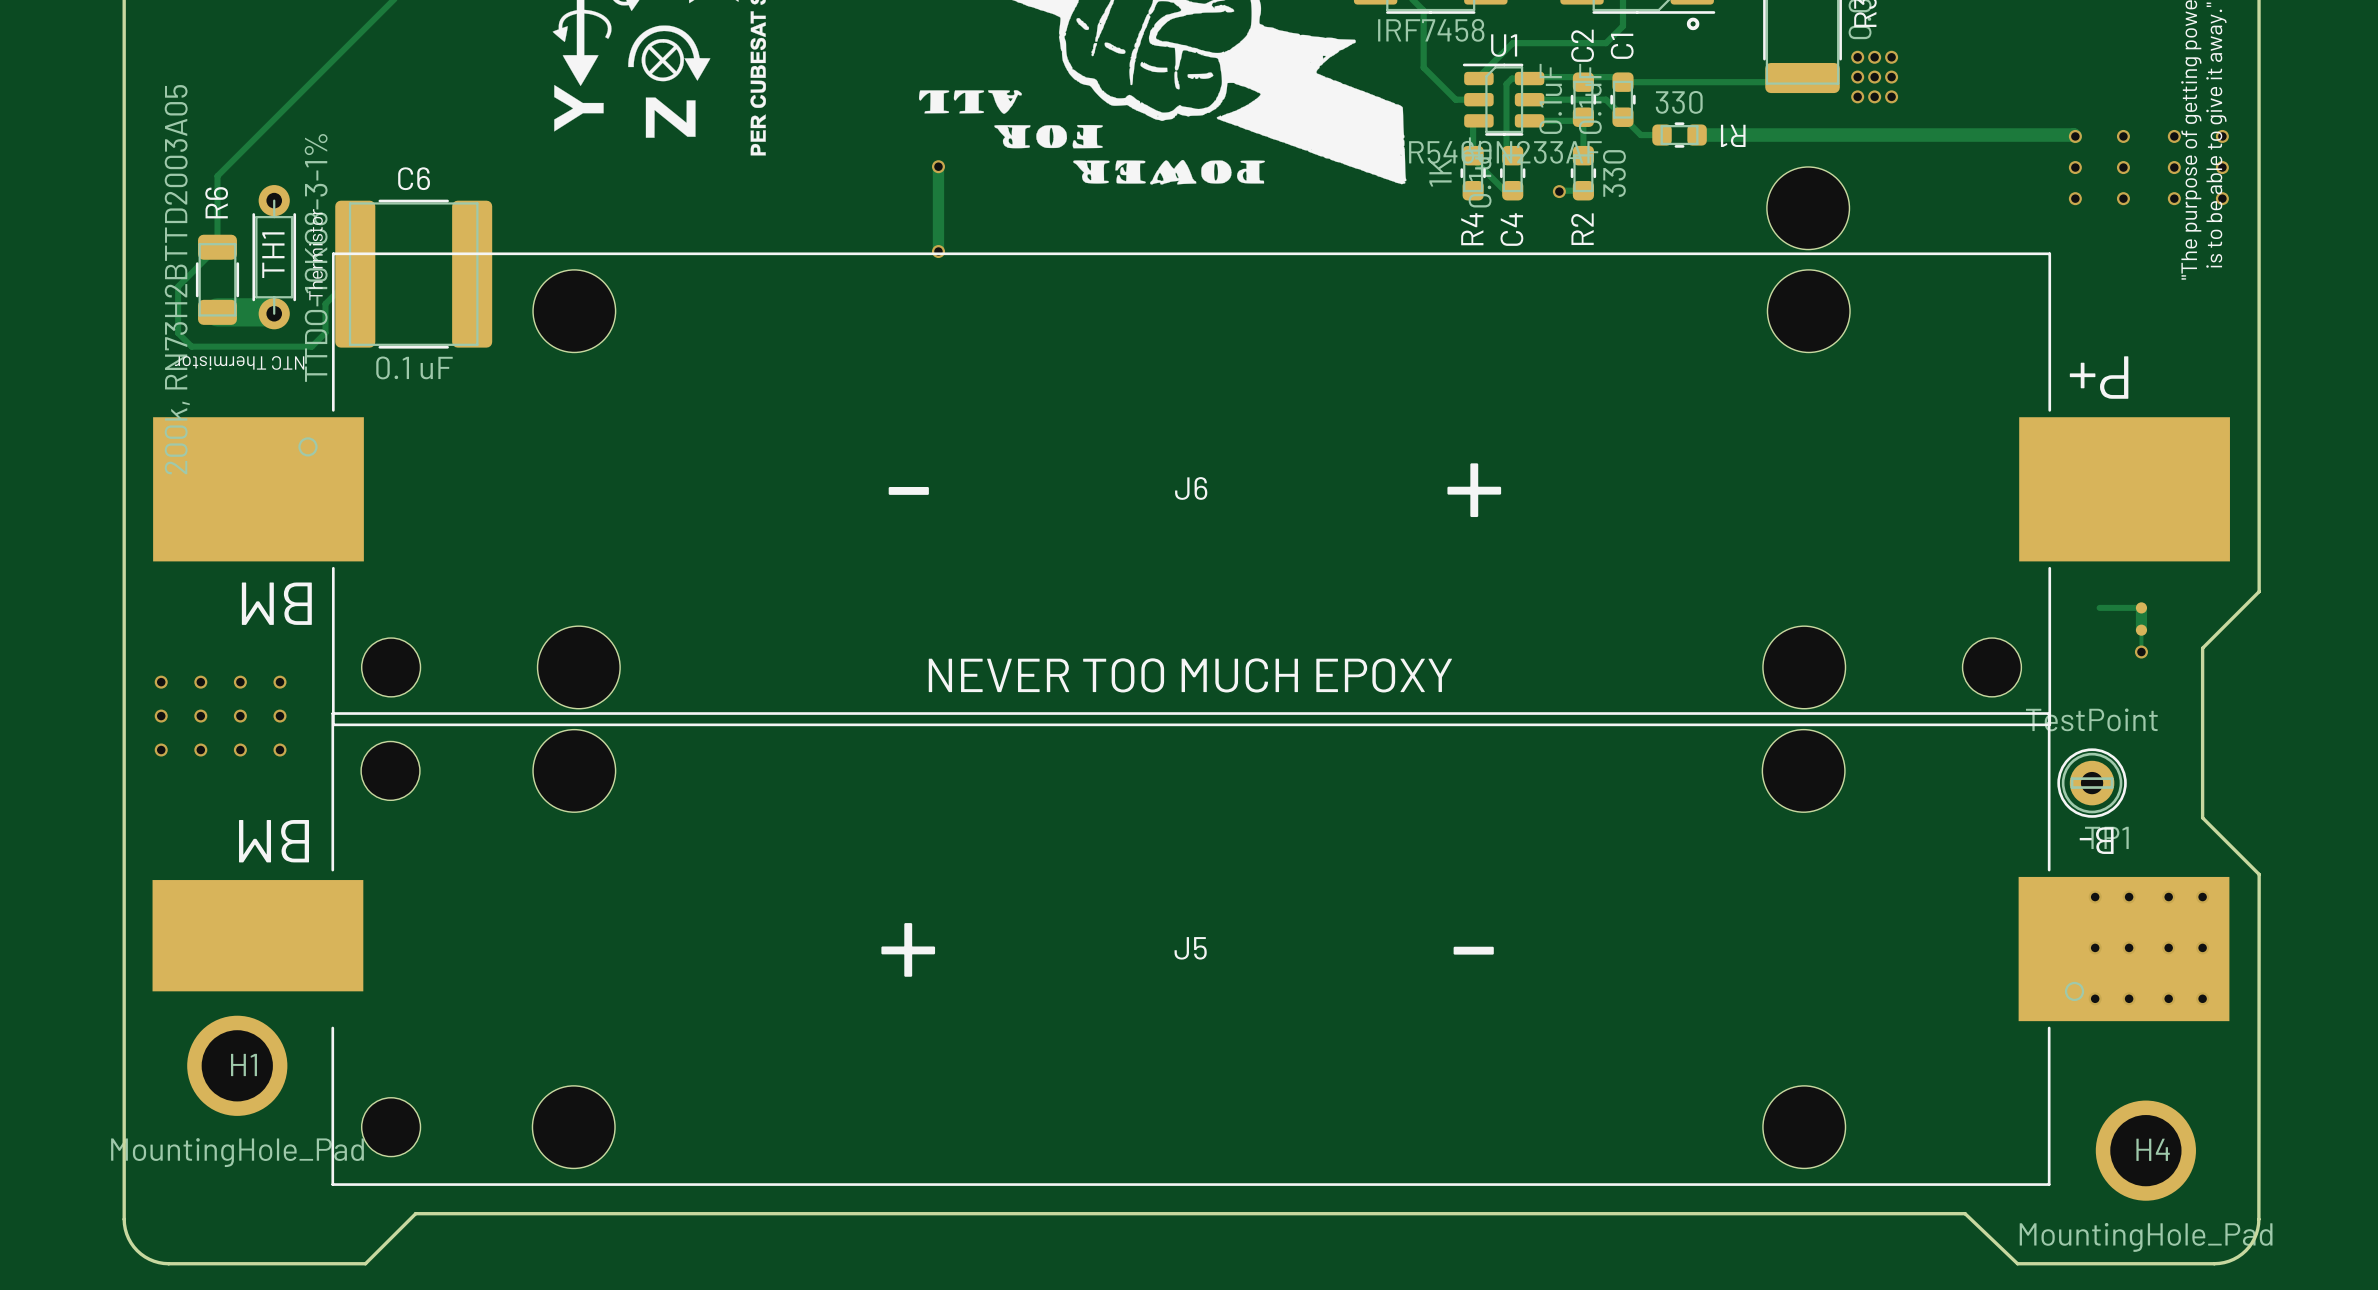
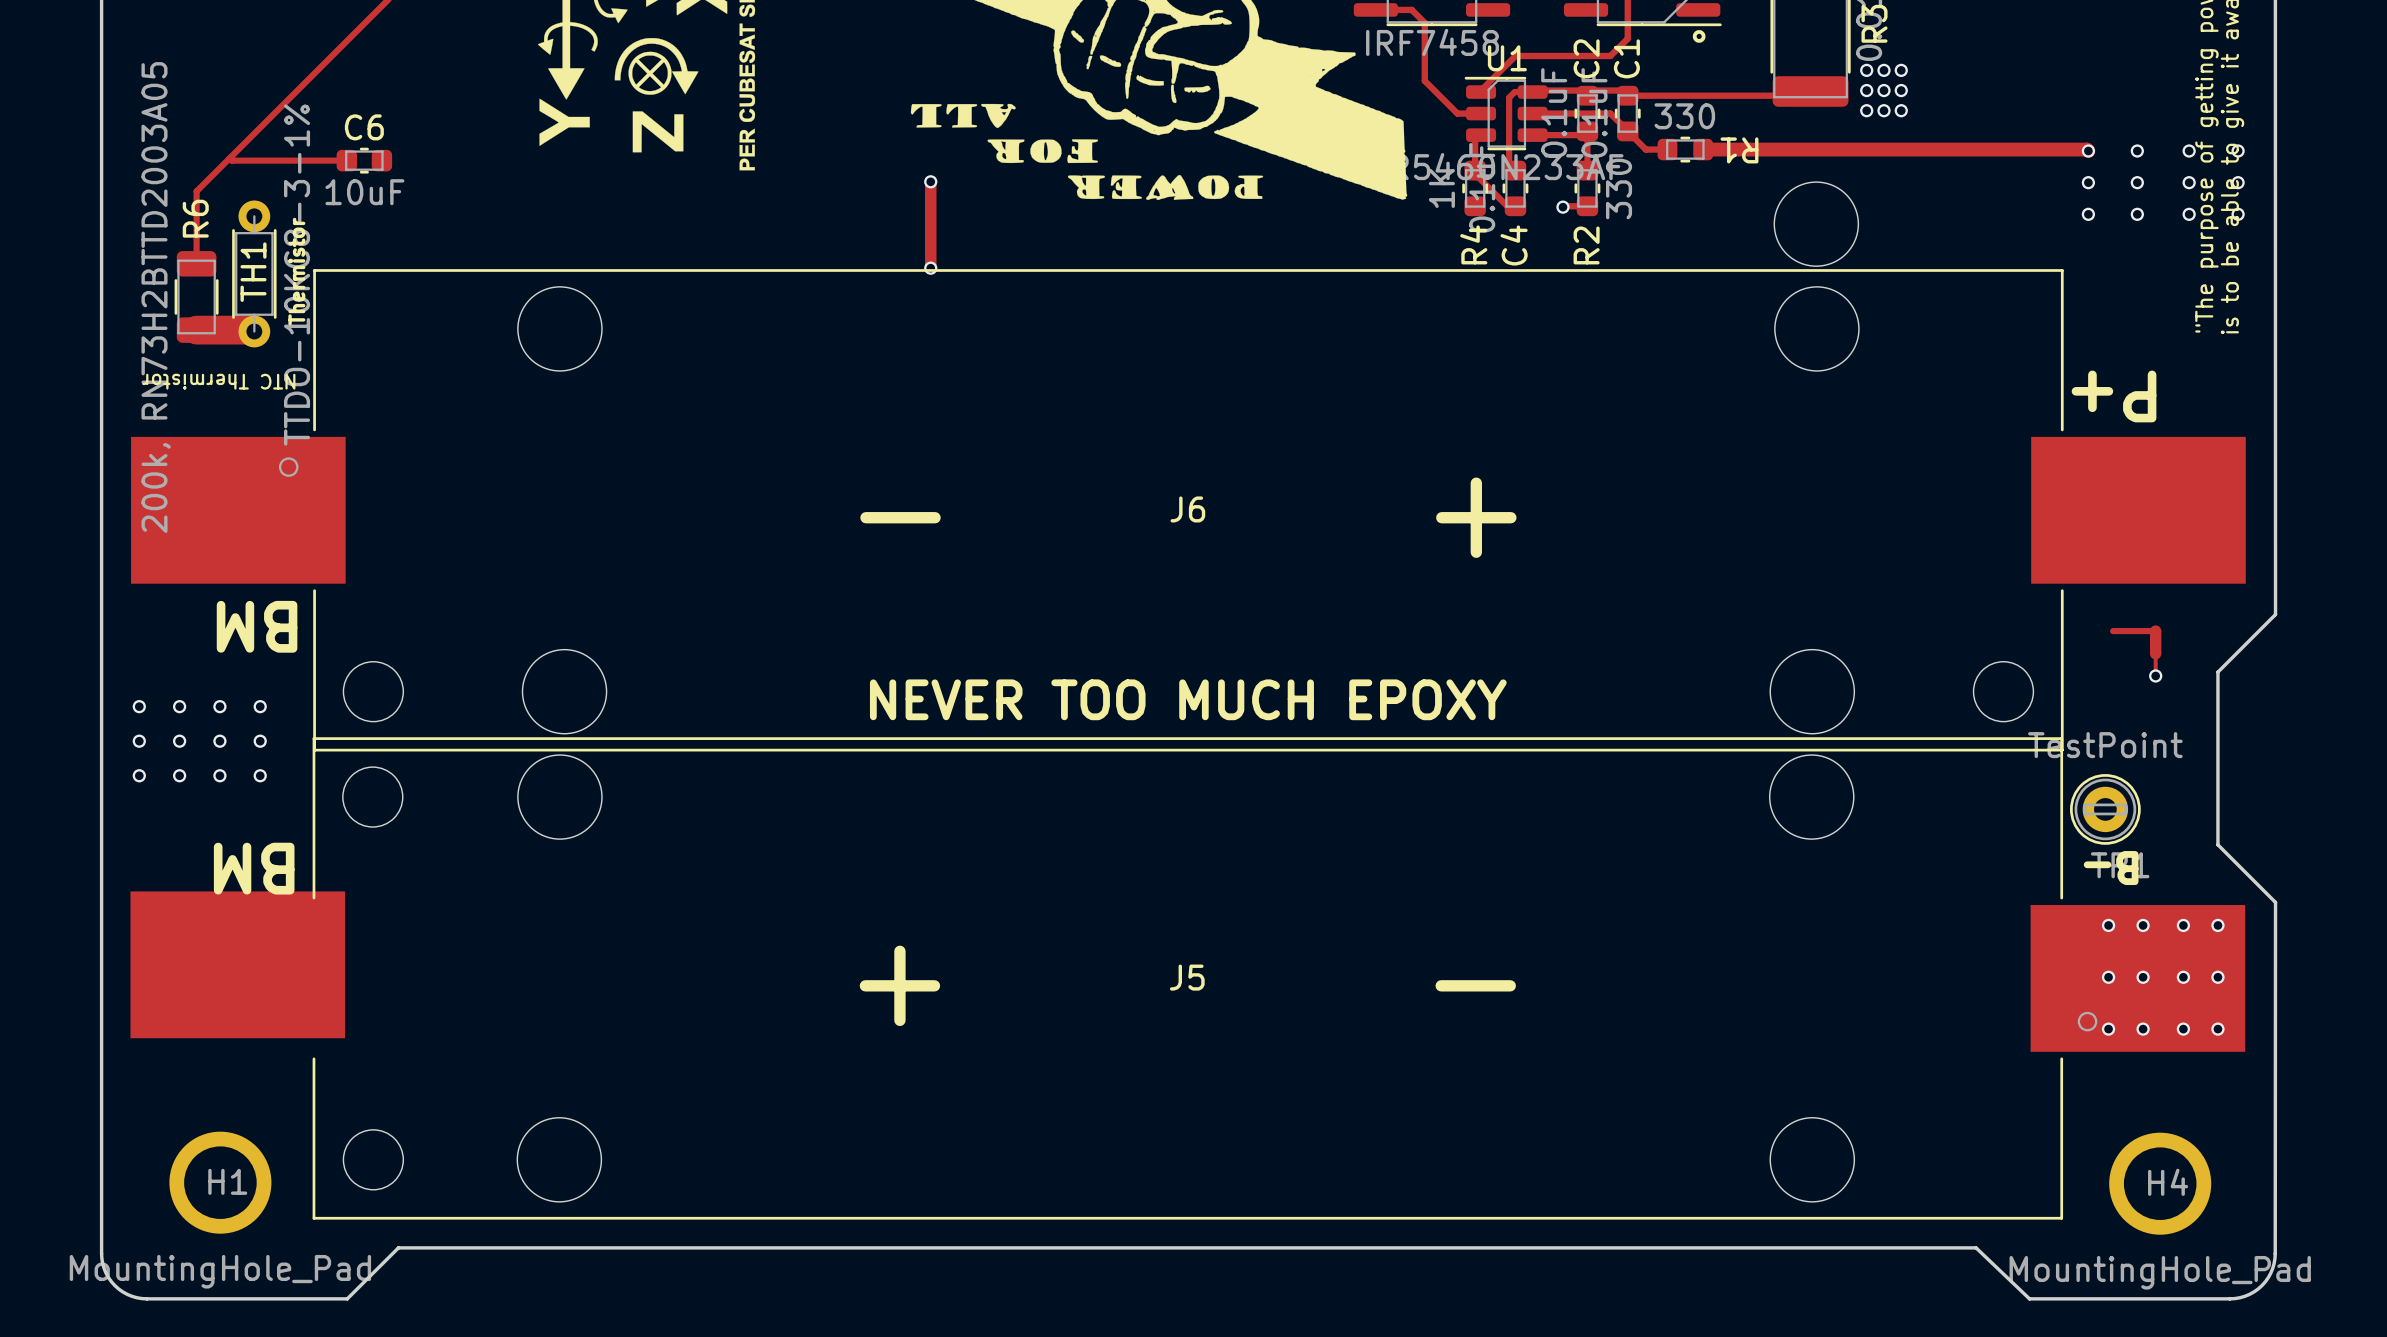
track: none -> (229, 158) (231, 160) (346, 160)
C6 name position: C6 (414, 178) -> C6 (364, 127)
C6 footprint: [335, 199, 493, 349] -> [336, 147, 393, 174]
track: (217, 247) (178, 286) (178, 333) (191, 346) (311, 346) (325, 332) (325, 303) (355, 274) -> none
C6 value: 0.1 uF (414, 367) -> 10uF (364, 192)
J5 footprint: [152, 712, 2230, 1186] -> [130, 737, 2246, 1220]
H1 position: (237, 1065) -> (220, 1182)

